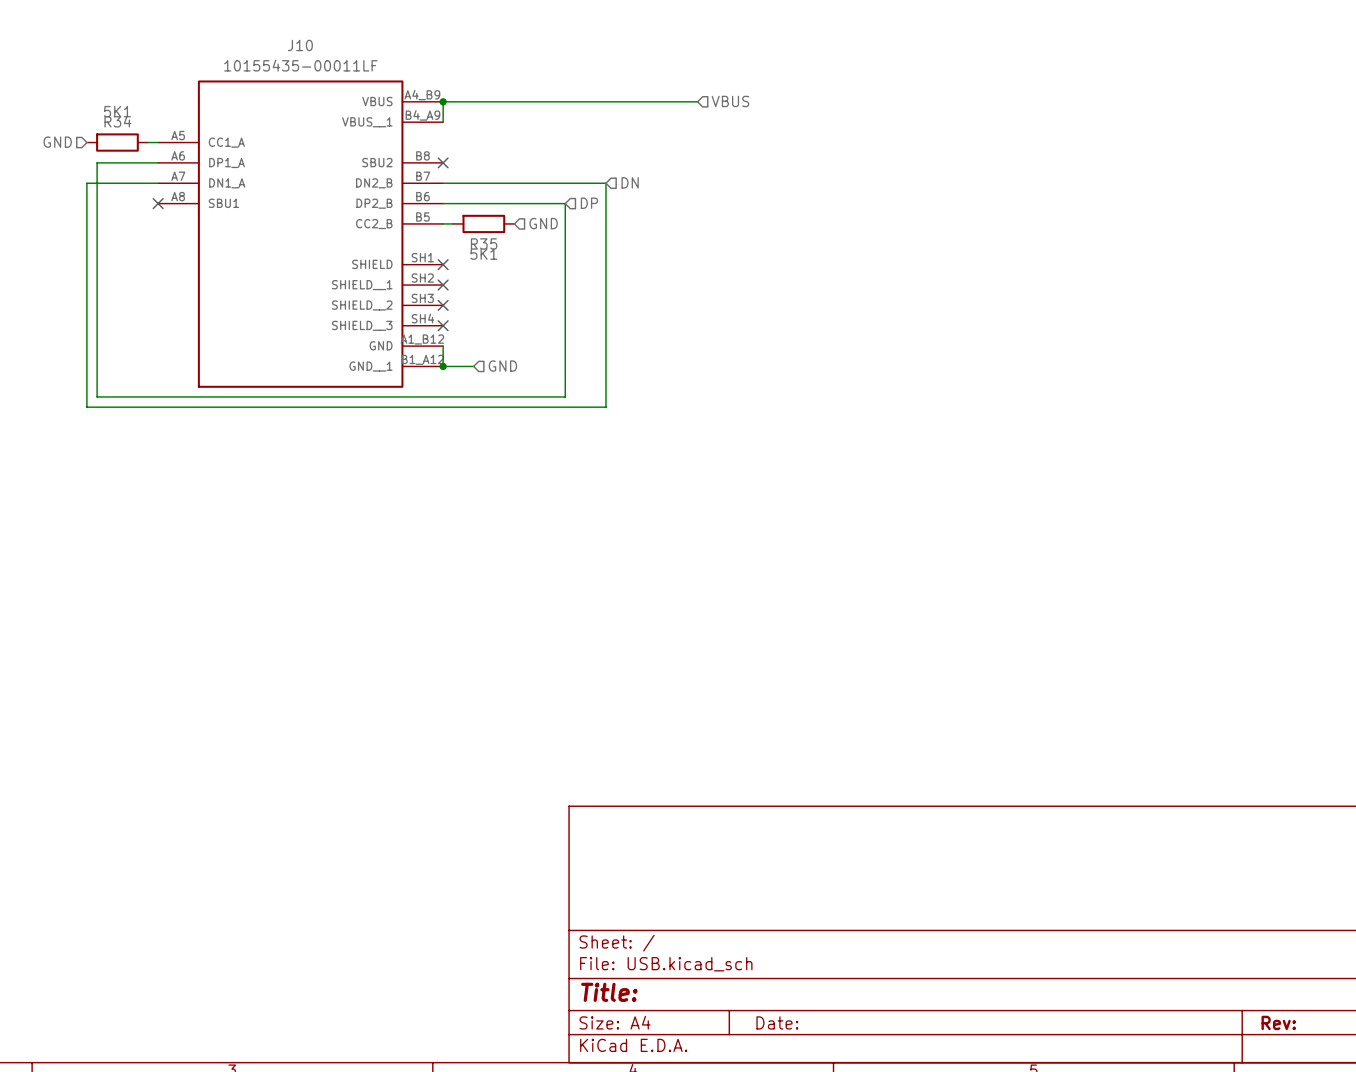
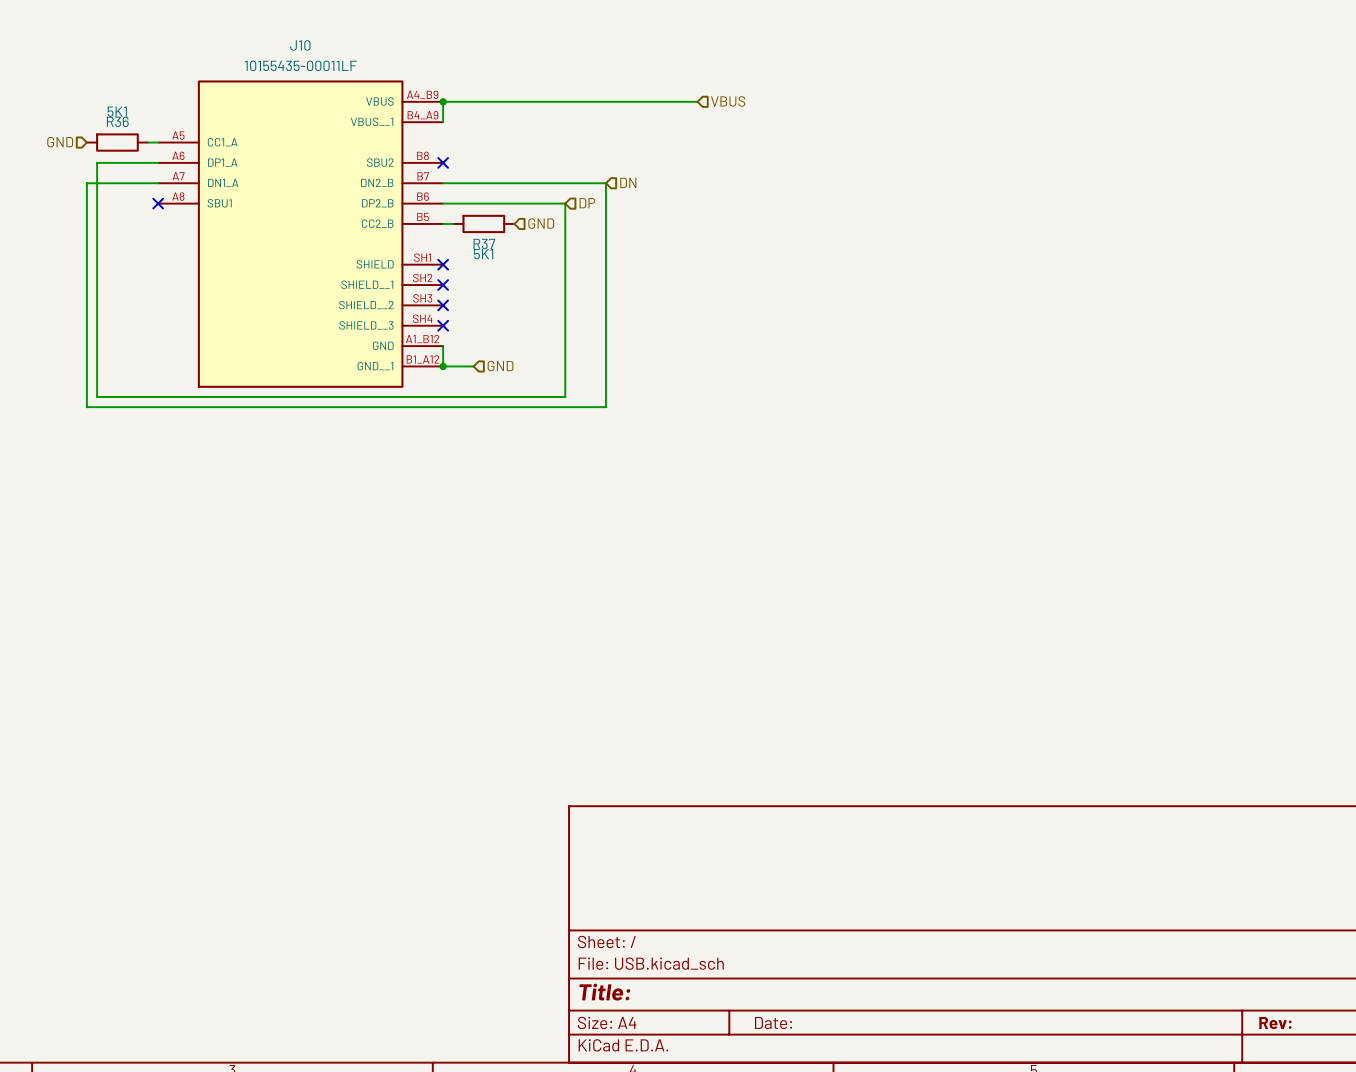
R34 name: R34 (117, 121) -> R36 (117, 121)
R35 name: R35 (484, 243) -> R37 (484, 243)

